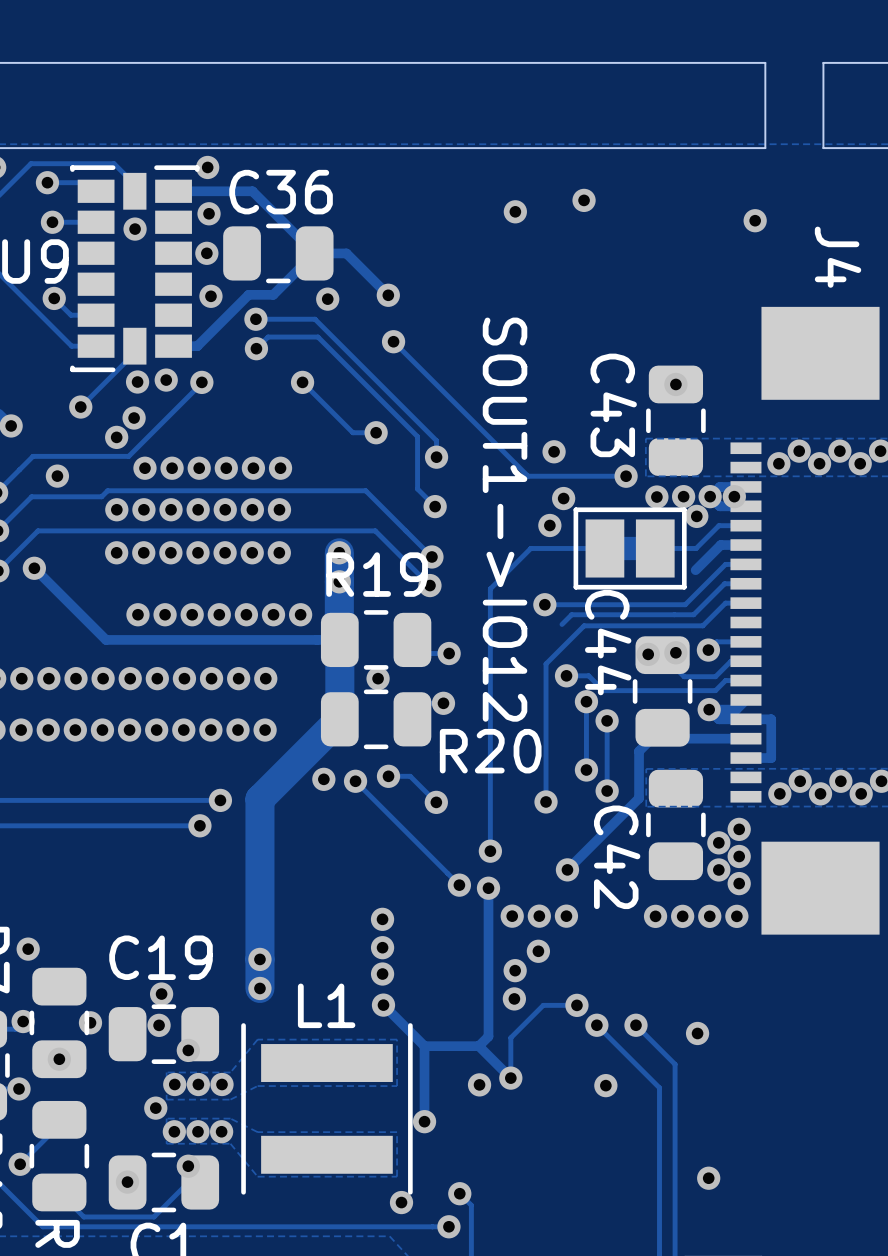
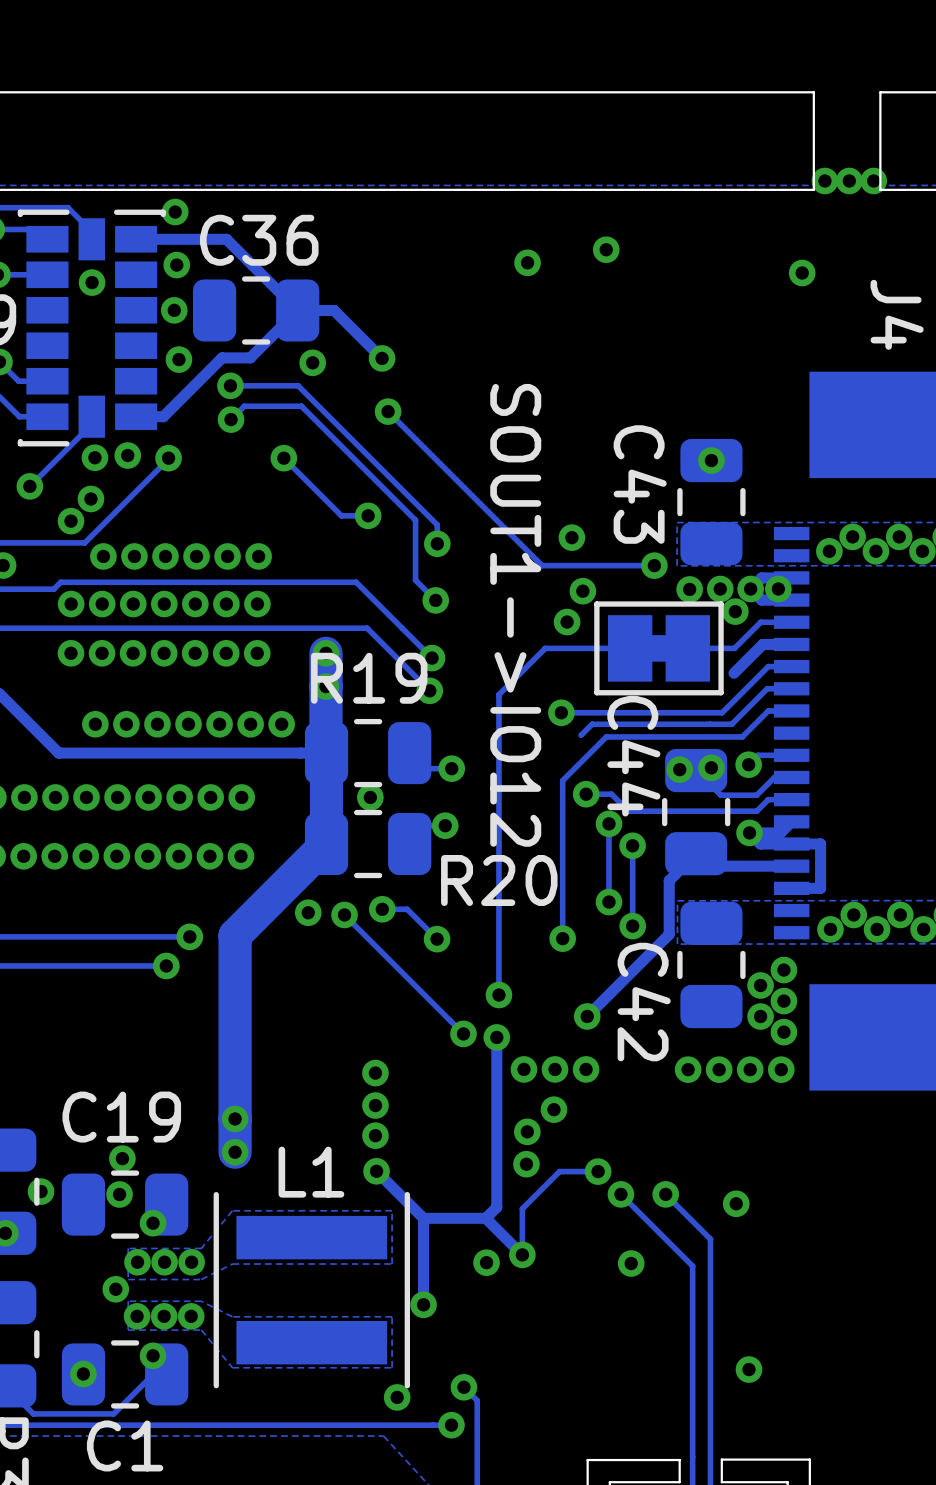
via: none -> (824, 180)
via: none -> (849, 180)
via: none -> (873, 180)

